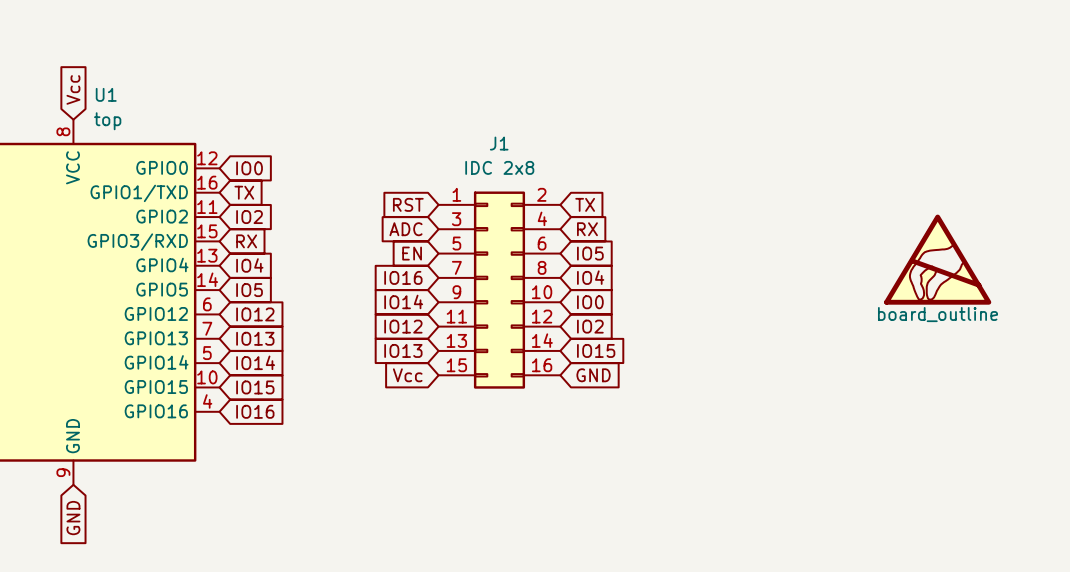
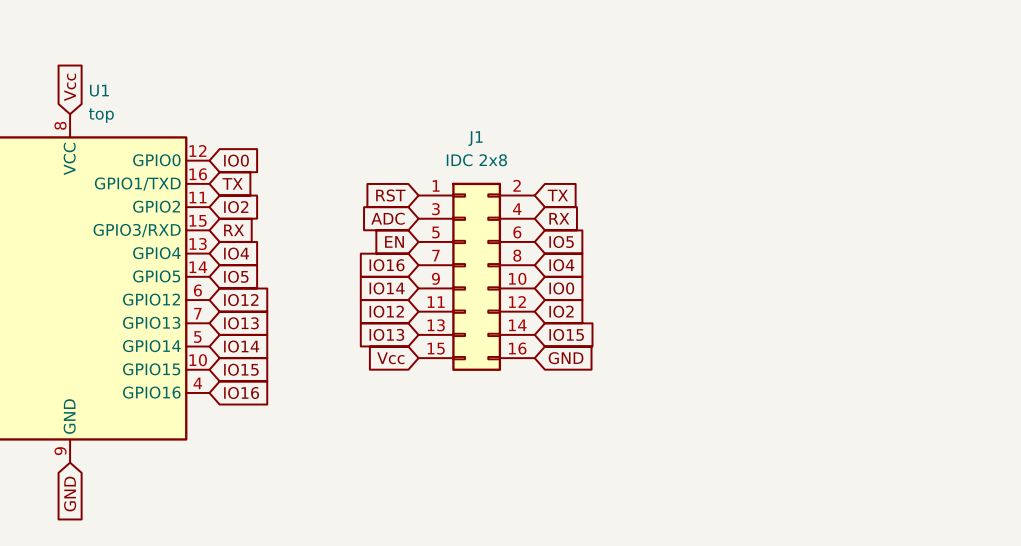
part: board_outline (937, 259) -> none

